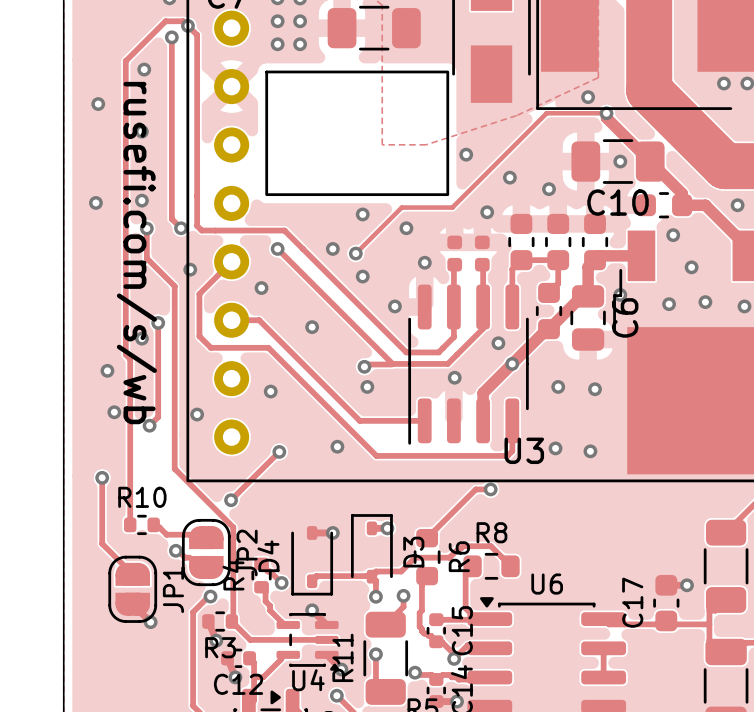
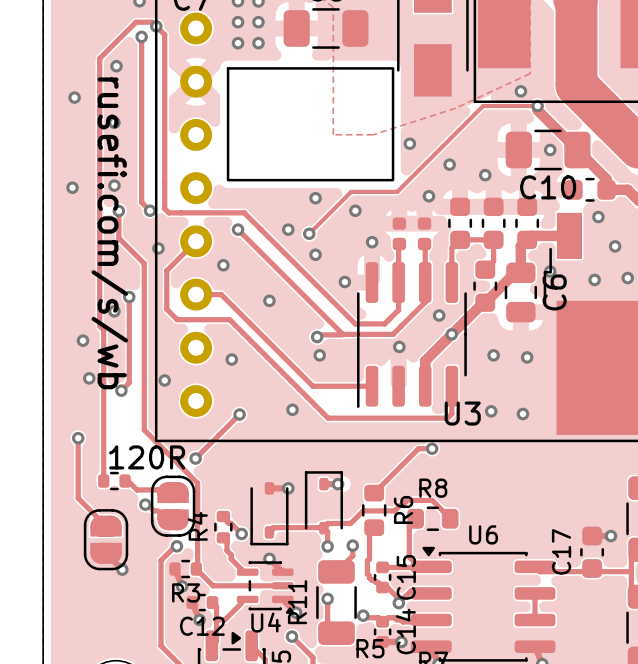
R10 name: R10 (142, 497) -> none
text: none -> 120R (147, 457)
JP2 name: JP2 (247, 552) -> none
D3 name: D3 (413, 552) -> none
D4 name: D4 (268, 556) -> none
JP1 name: JP1 (173, 589) -> none

